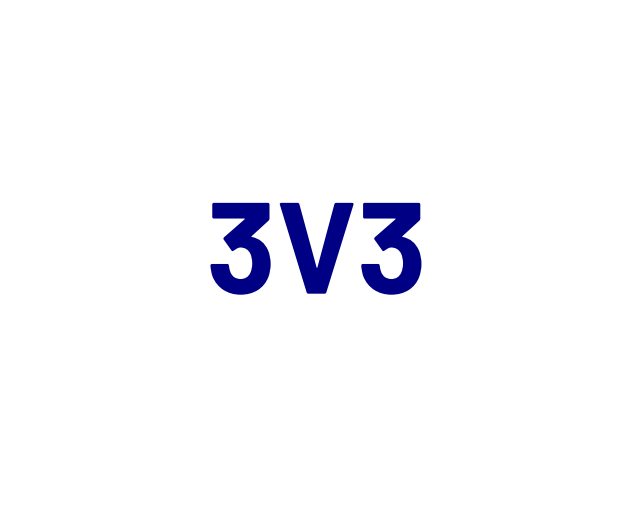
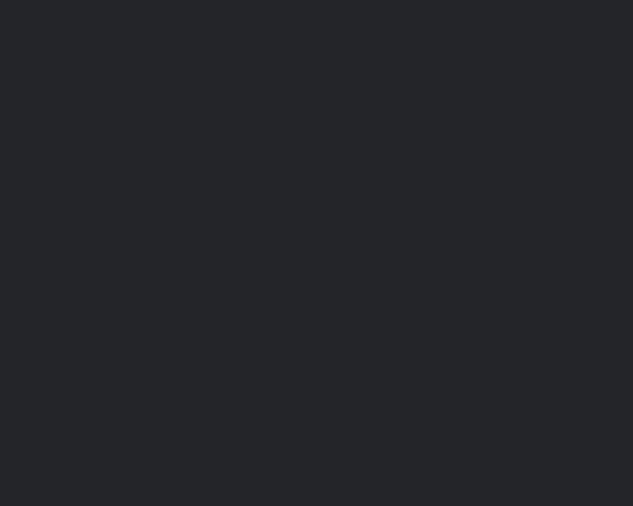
text: 3V3 (315, 248) -> none

